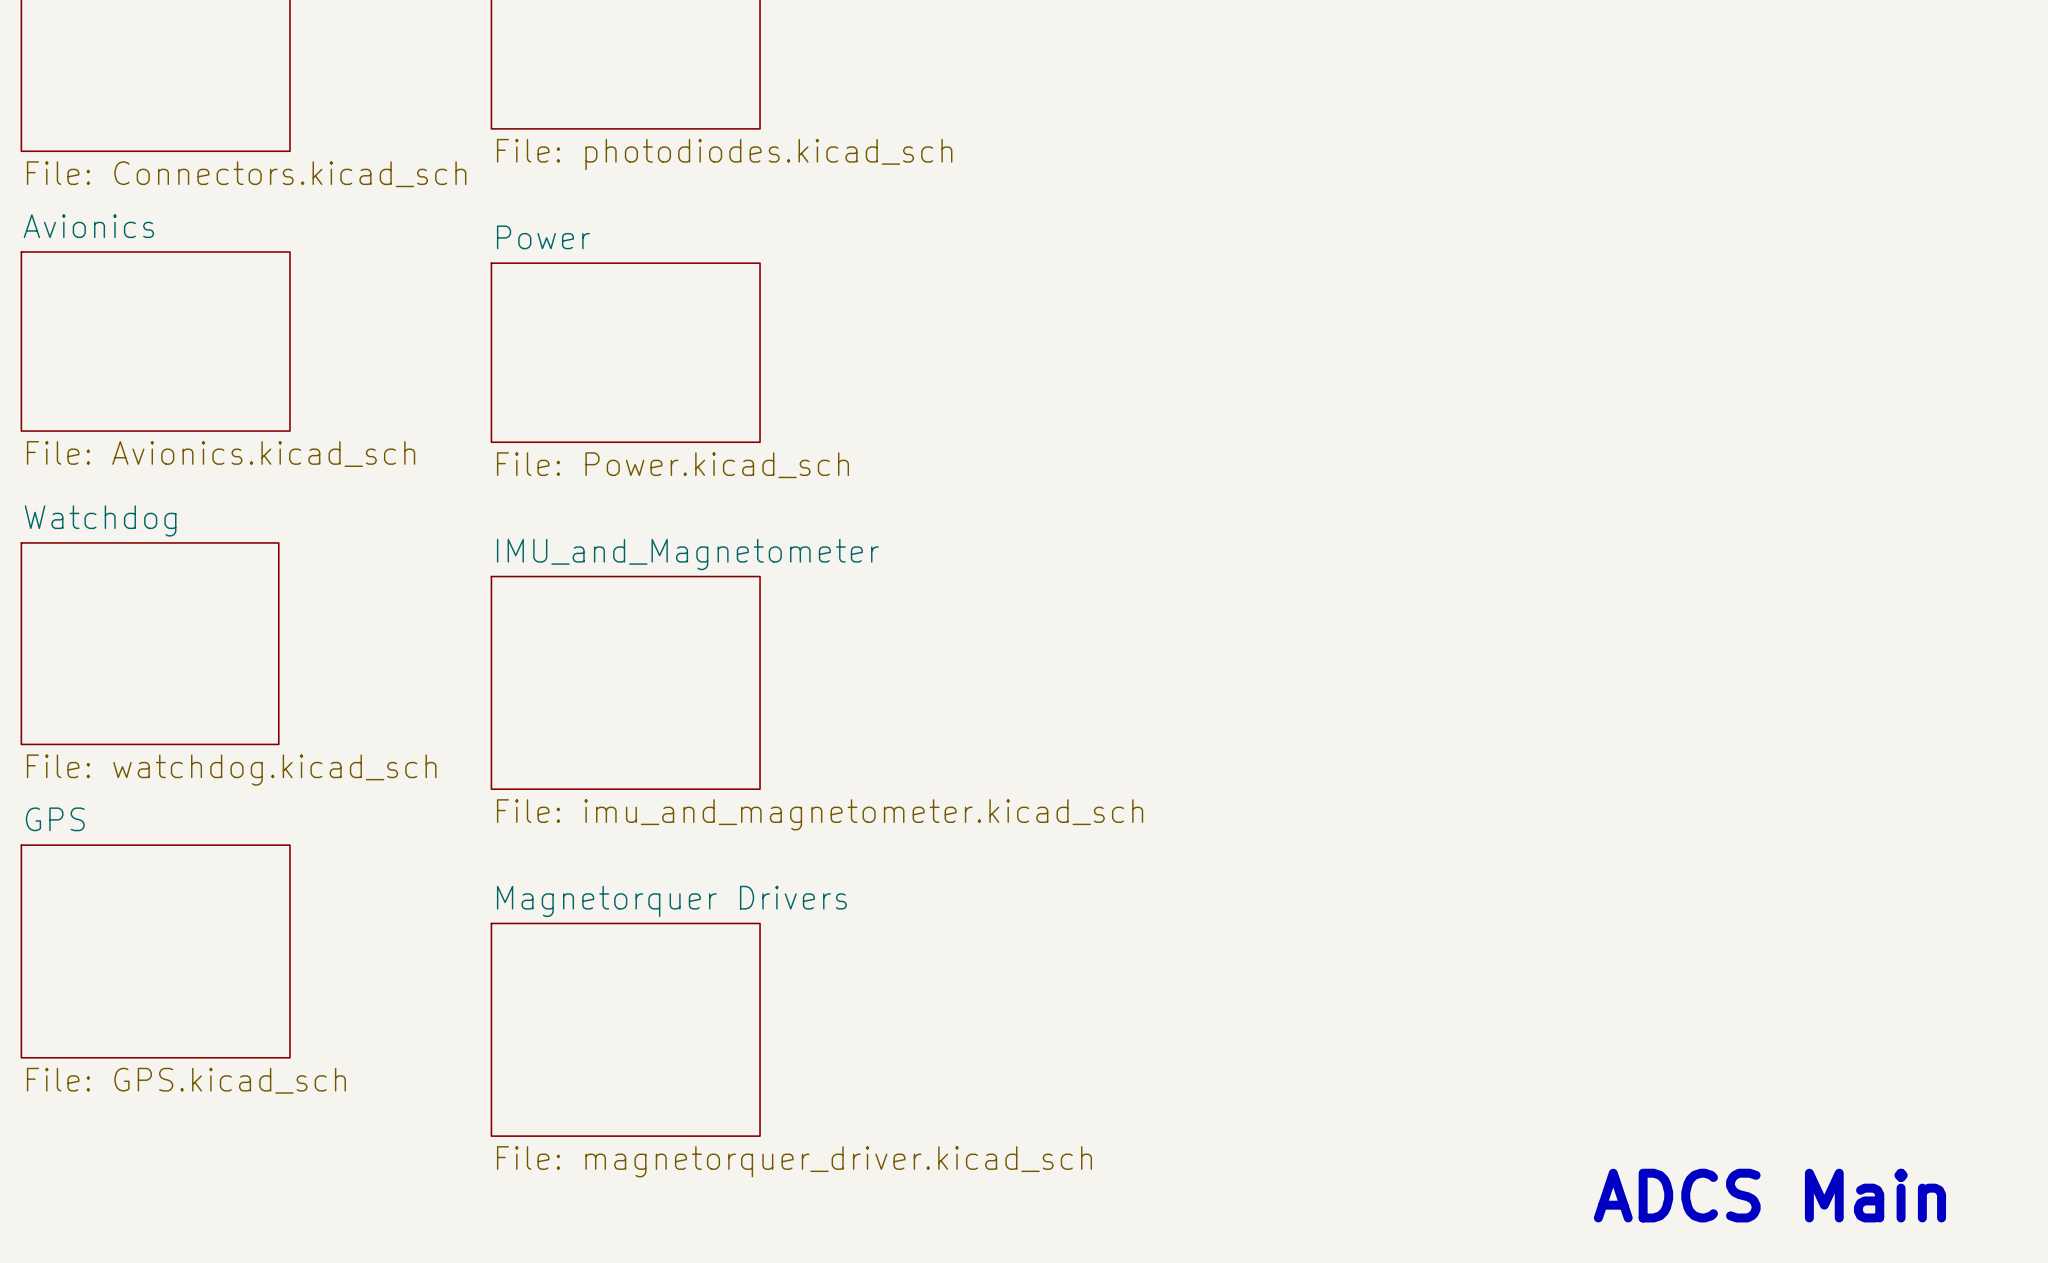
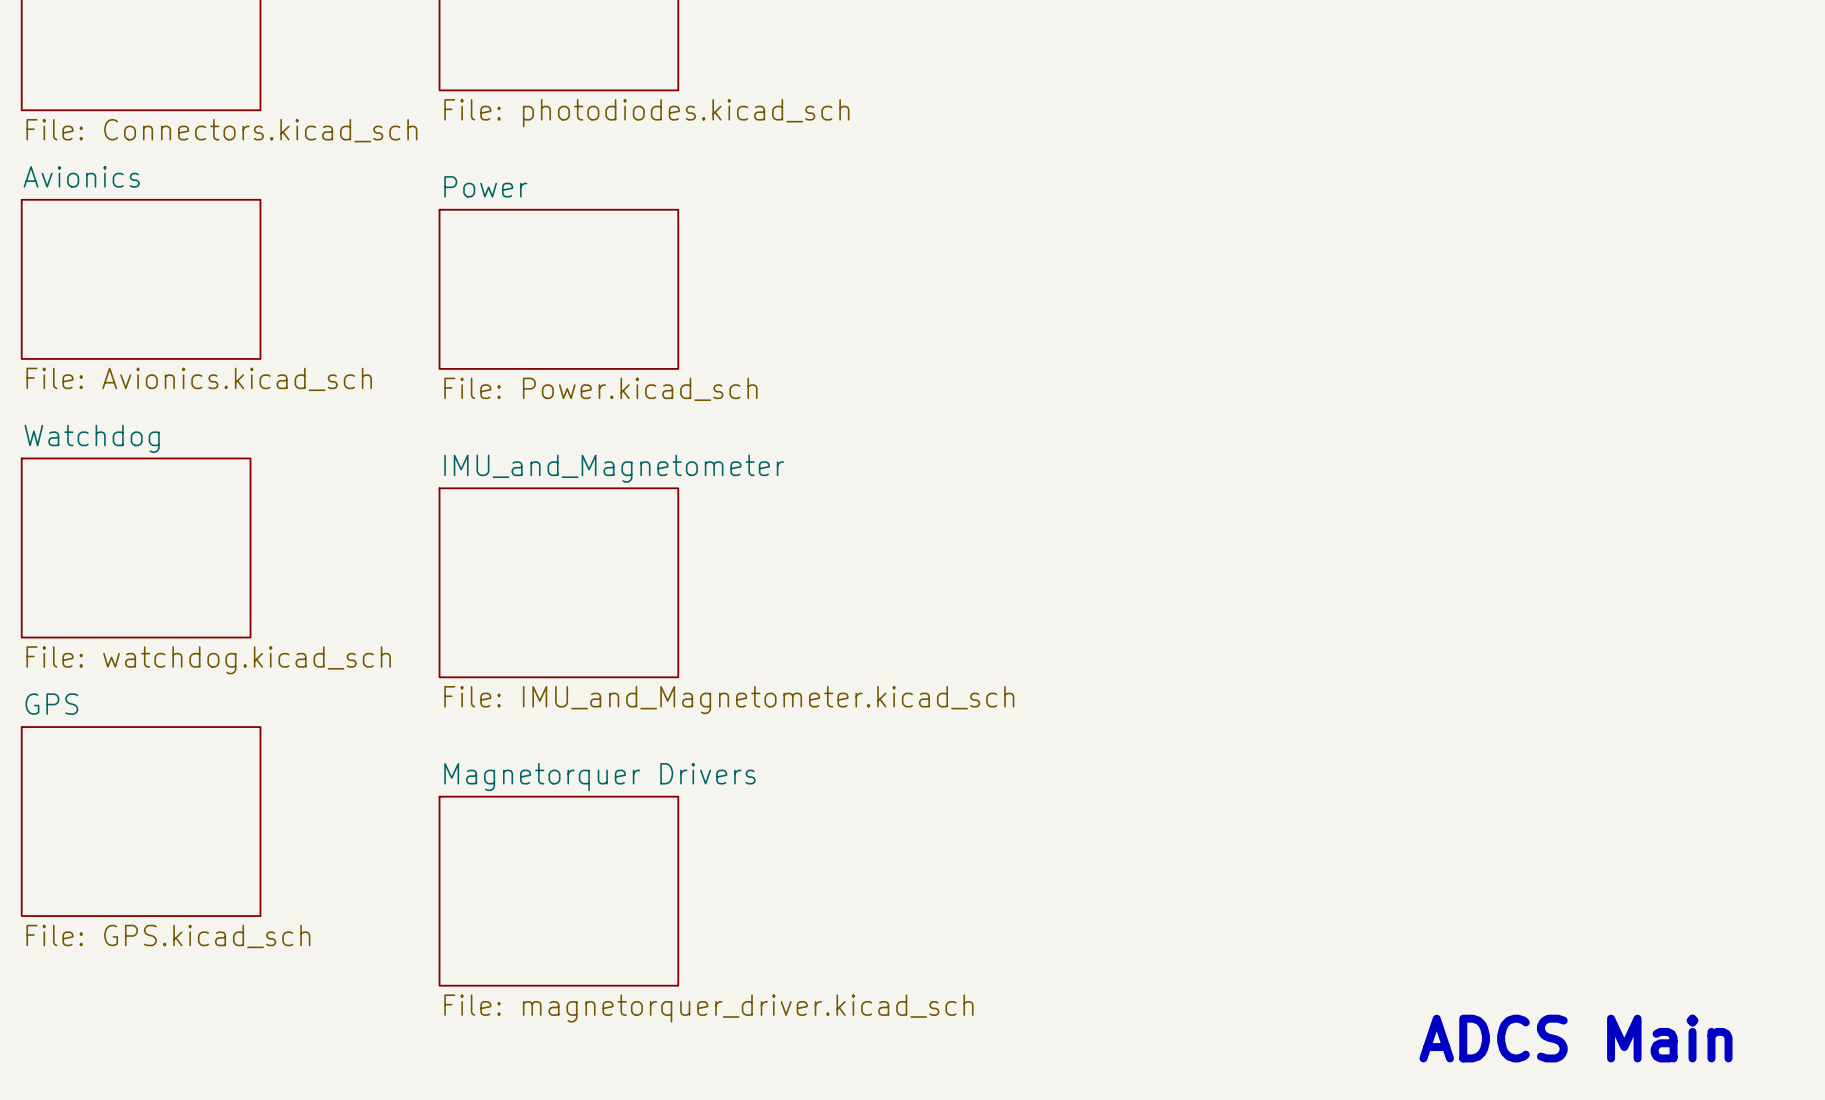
sheet IMU_and_Magnetometer value: File: imu_and_magnetometer.kicad_sch (820, 814) -> File: IMU_and_Magnetometer.kicad_sch (729, 700)

